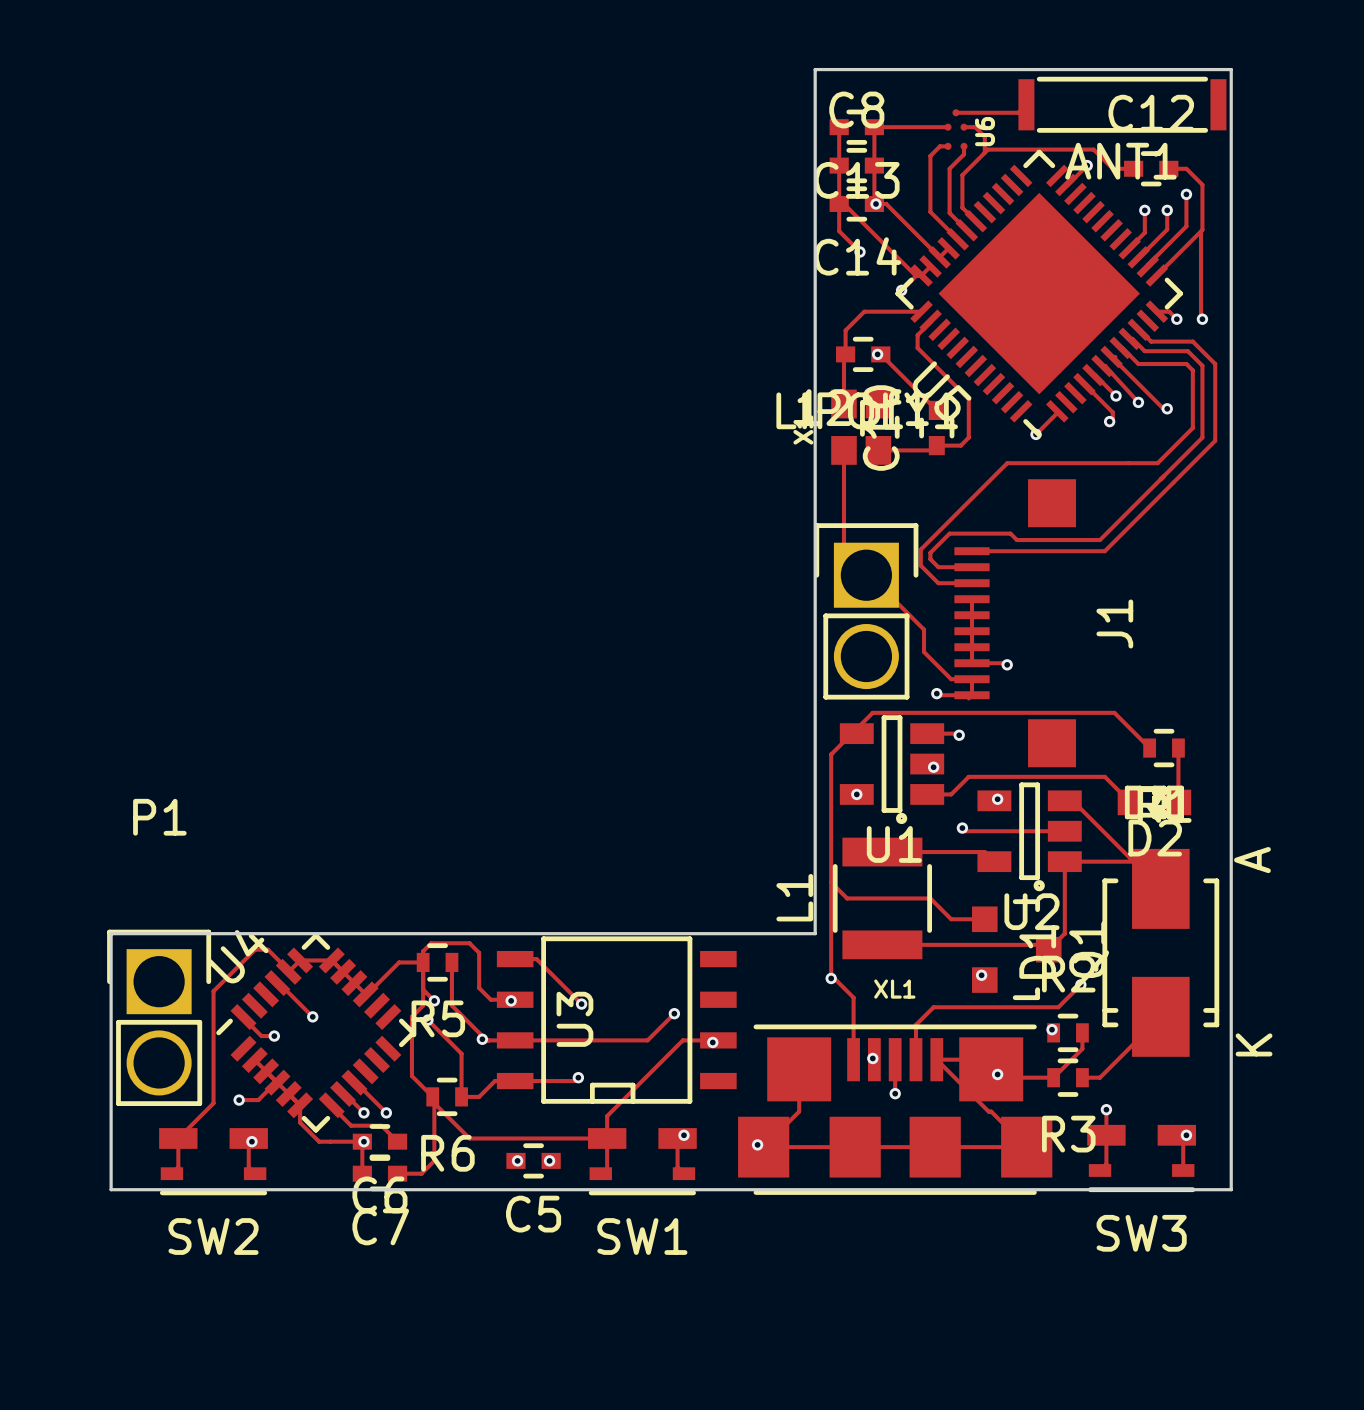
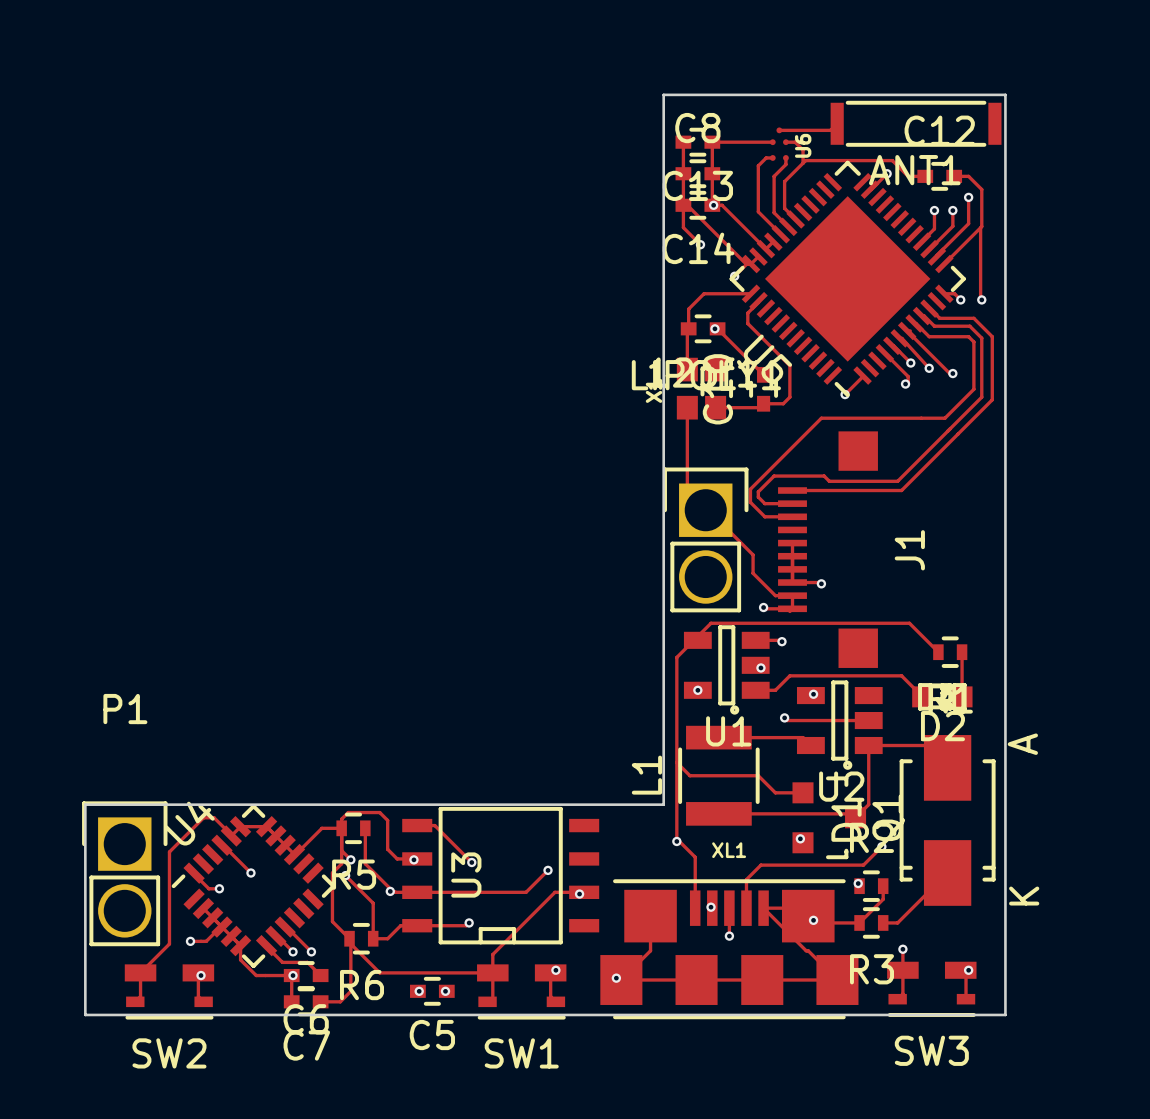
track: (972, 599) (972, 615) -> none
track: (1064, 800) (1072, 800) (1133, 861) -> none

